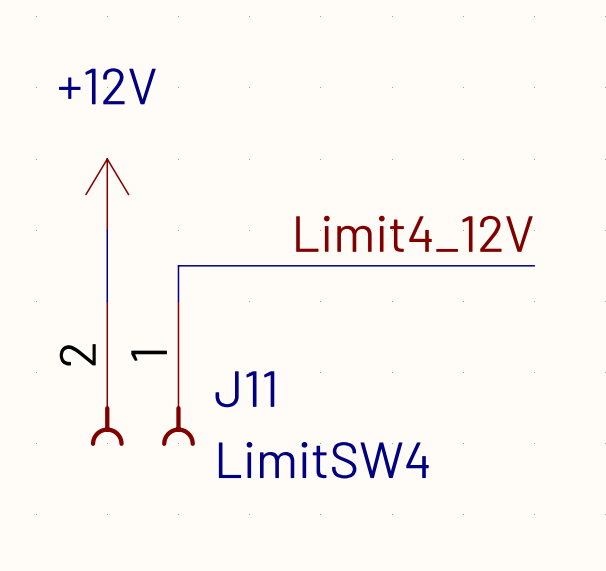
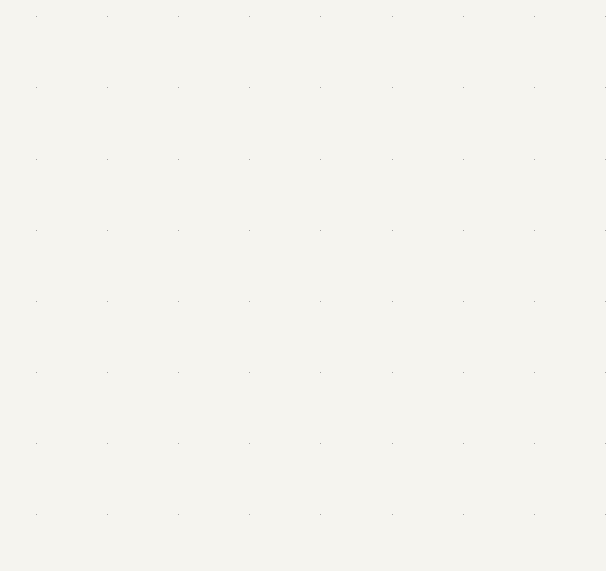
power symbol: +12V (107, 194) -> none
wire: (107, 230) (107, 301) -> none
label: Limit4_12V (414, 233) -> none
wire: (534, 265) (178, 265) (178, 301) -> none
J11: LimitSW4 (142, 373) -> none

